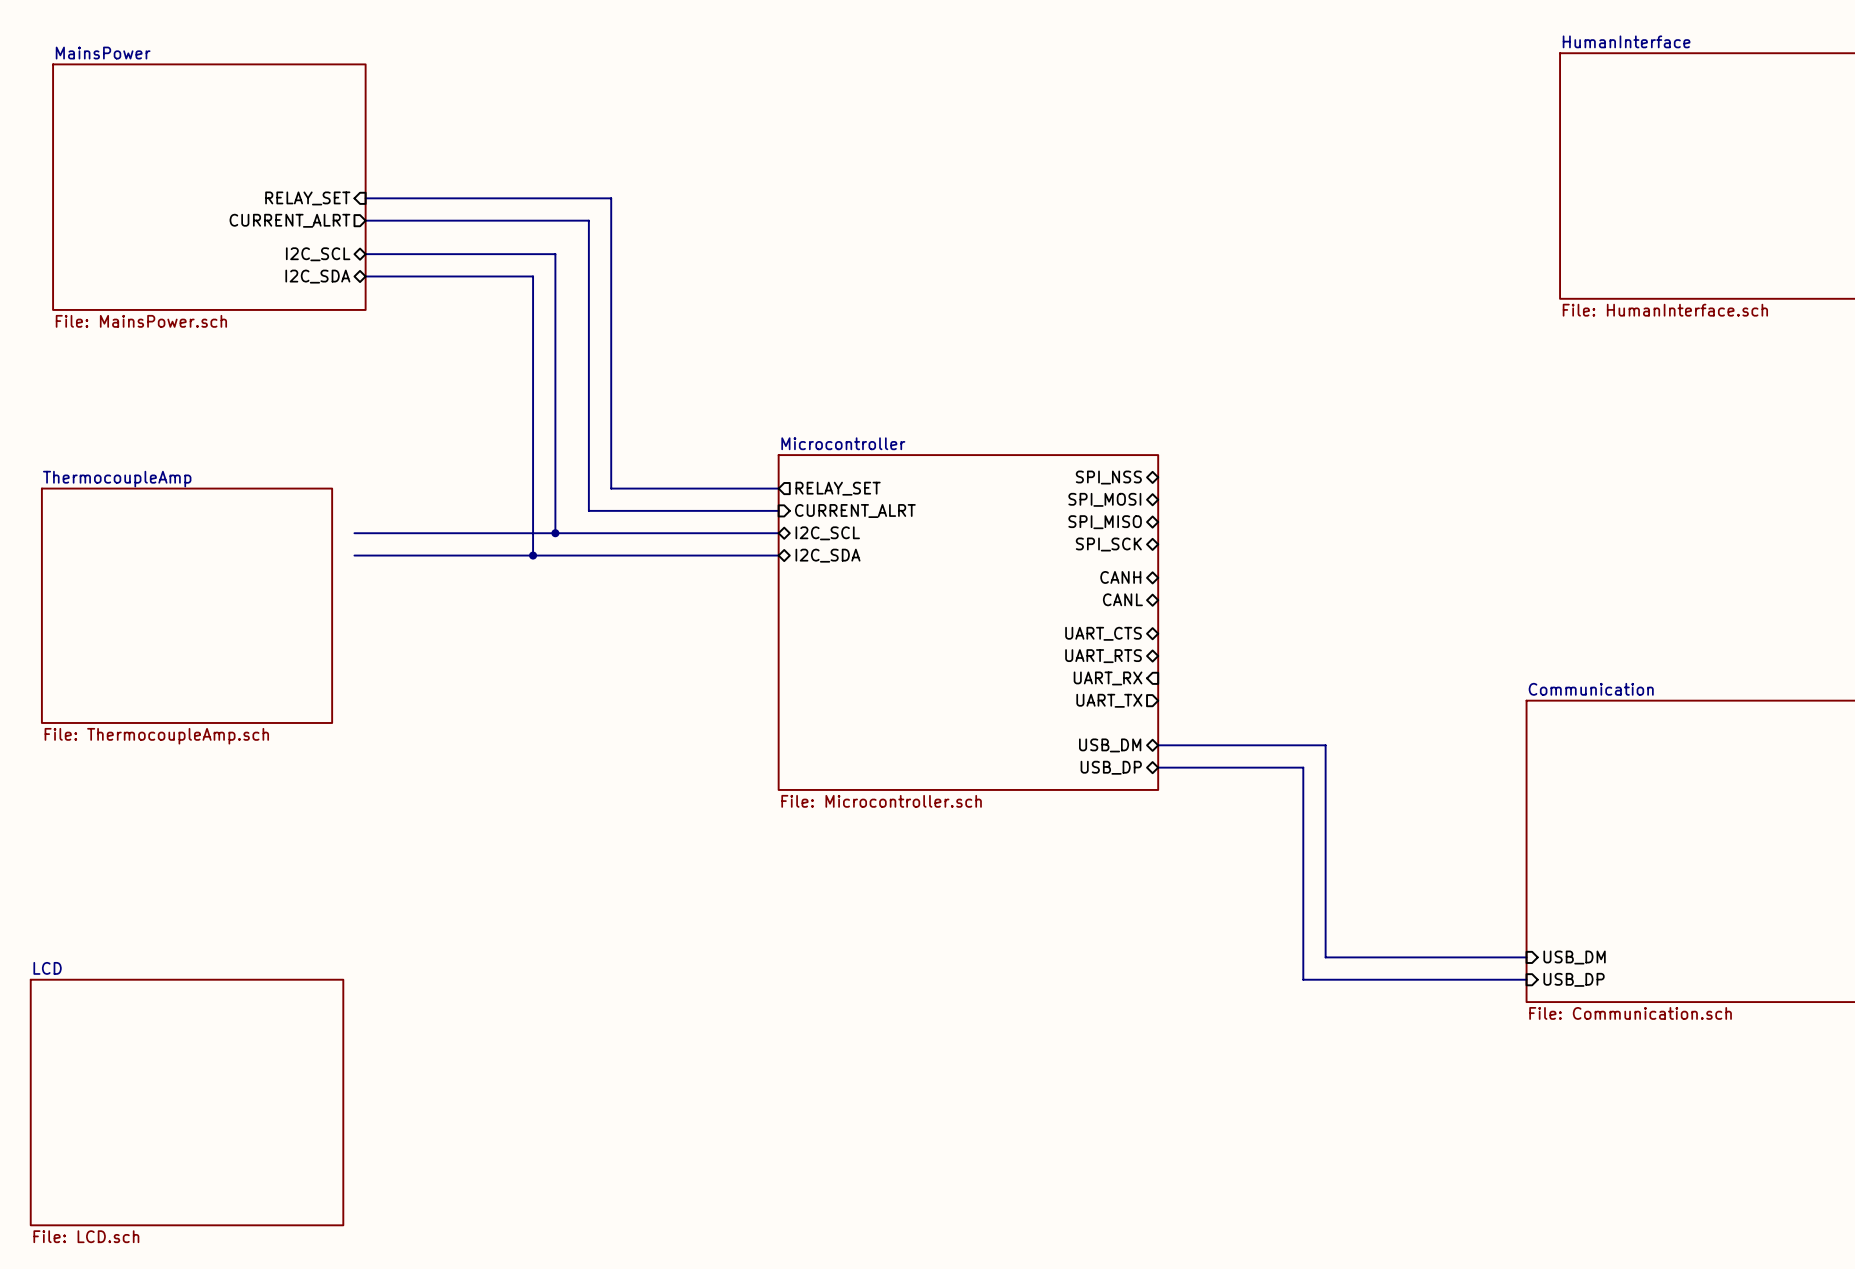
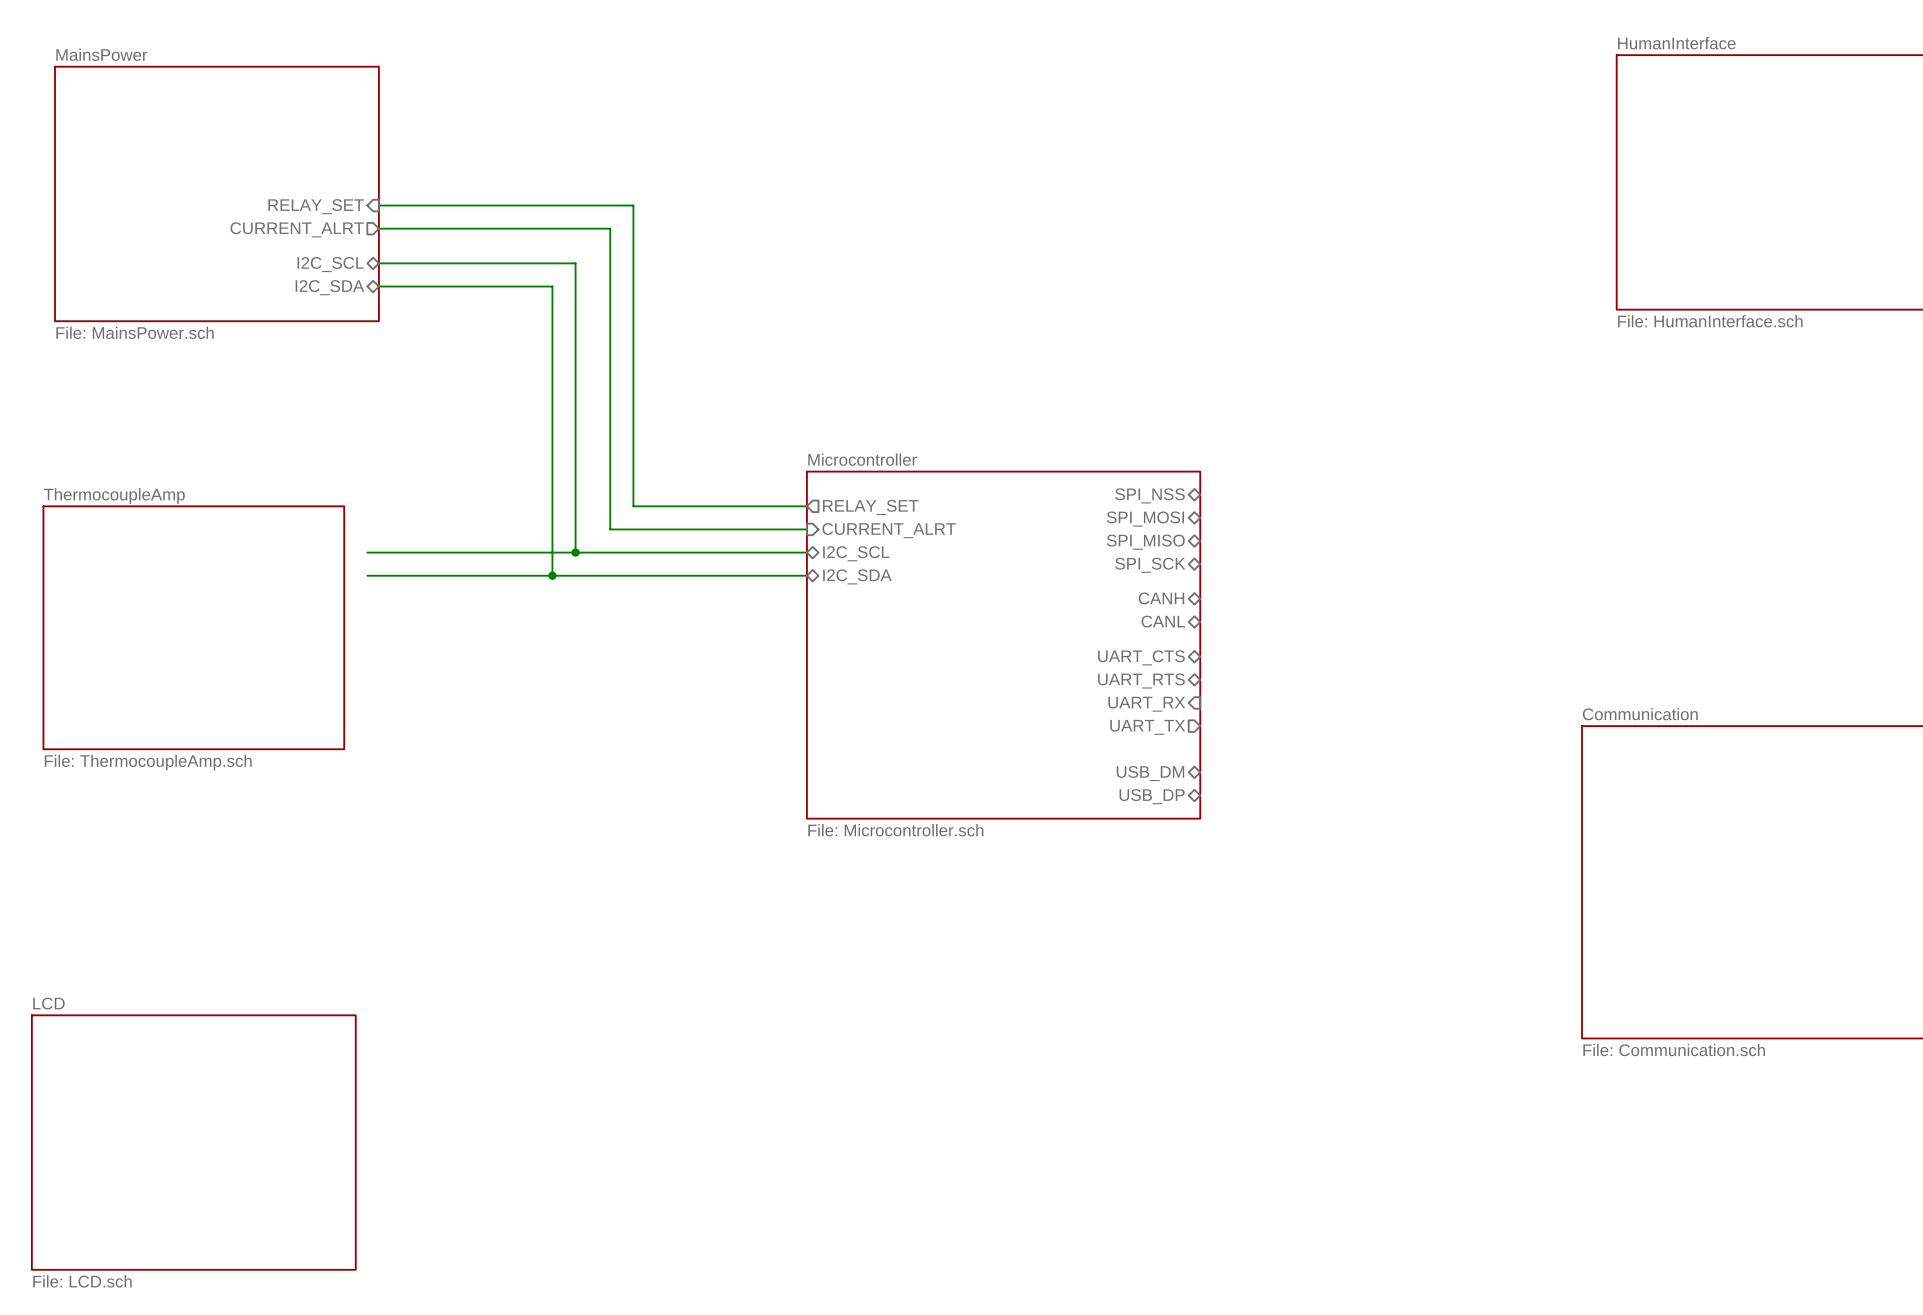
wire: (1158, 745) (1325, 745) (1325, 957) (1526, 957) -> none
wire: (1158, 767) (1303, 767) (1303, 979) (1526, 979) -> none
sheet pin: USB_DM (1574, 957) -> none
sheet pin: USB_DP (1574, 979) -> none

